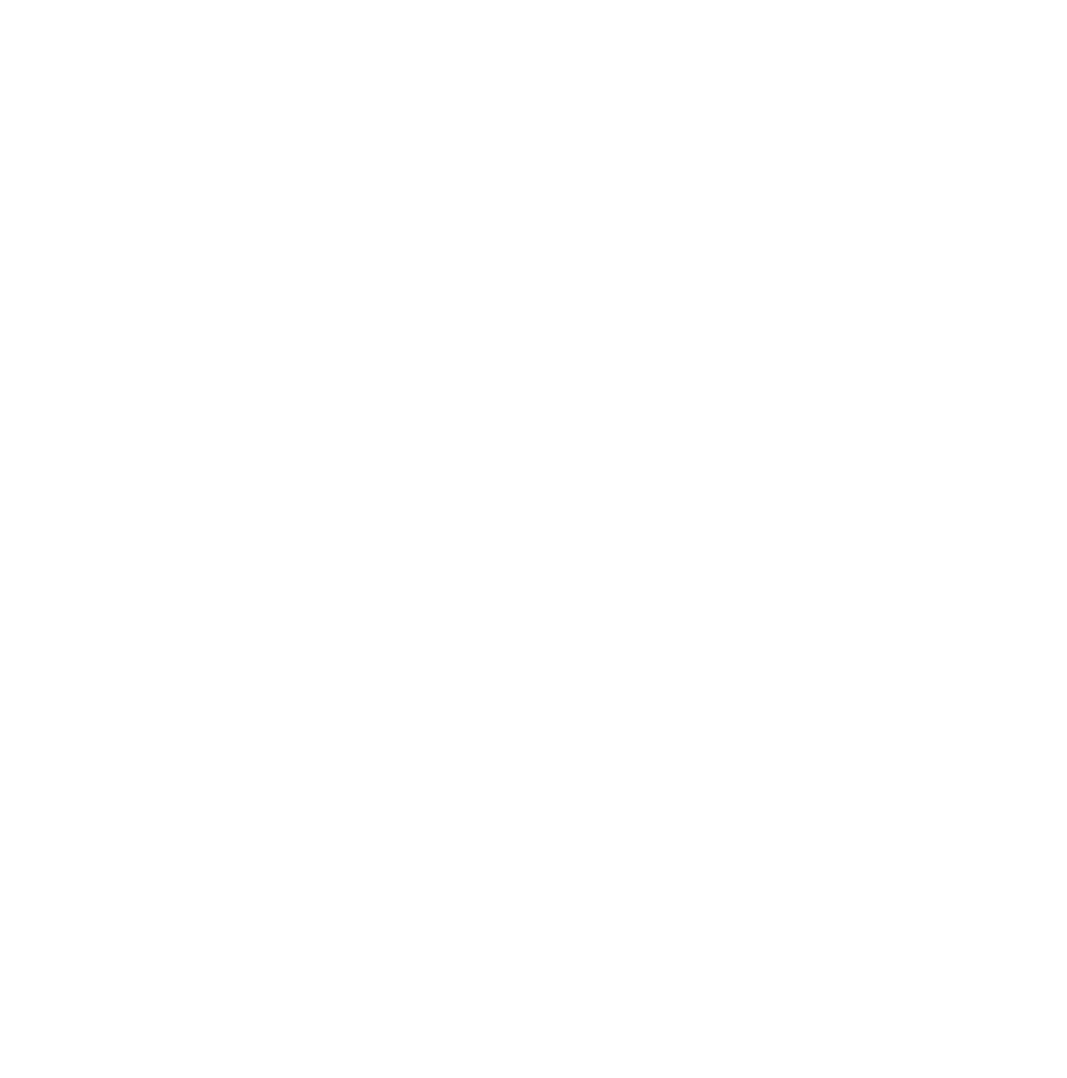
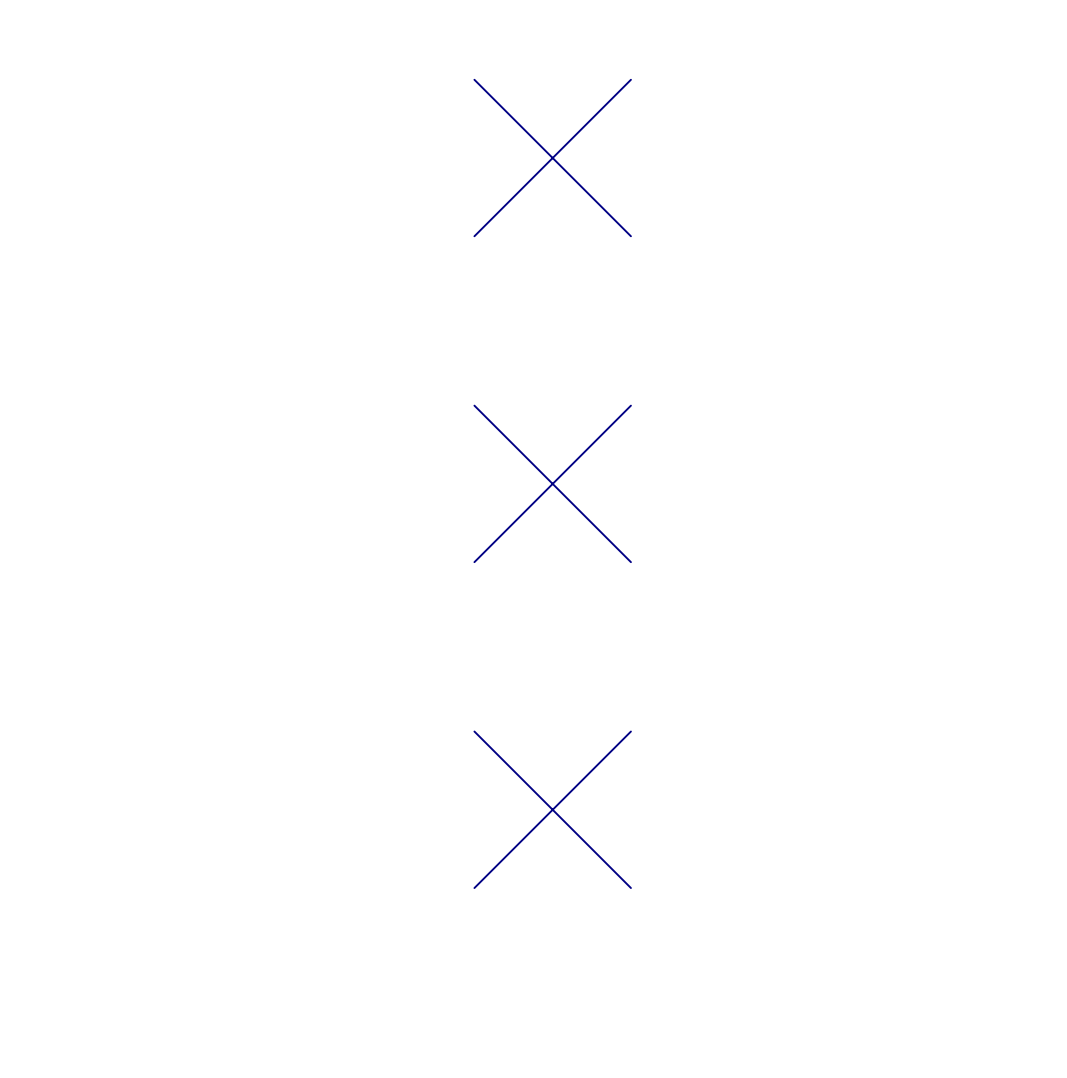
no-connect mark: none -> (552, 158)
no-connect mark: none -> (552, 483)
no-connect mark: none -> (552, 809)

